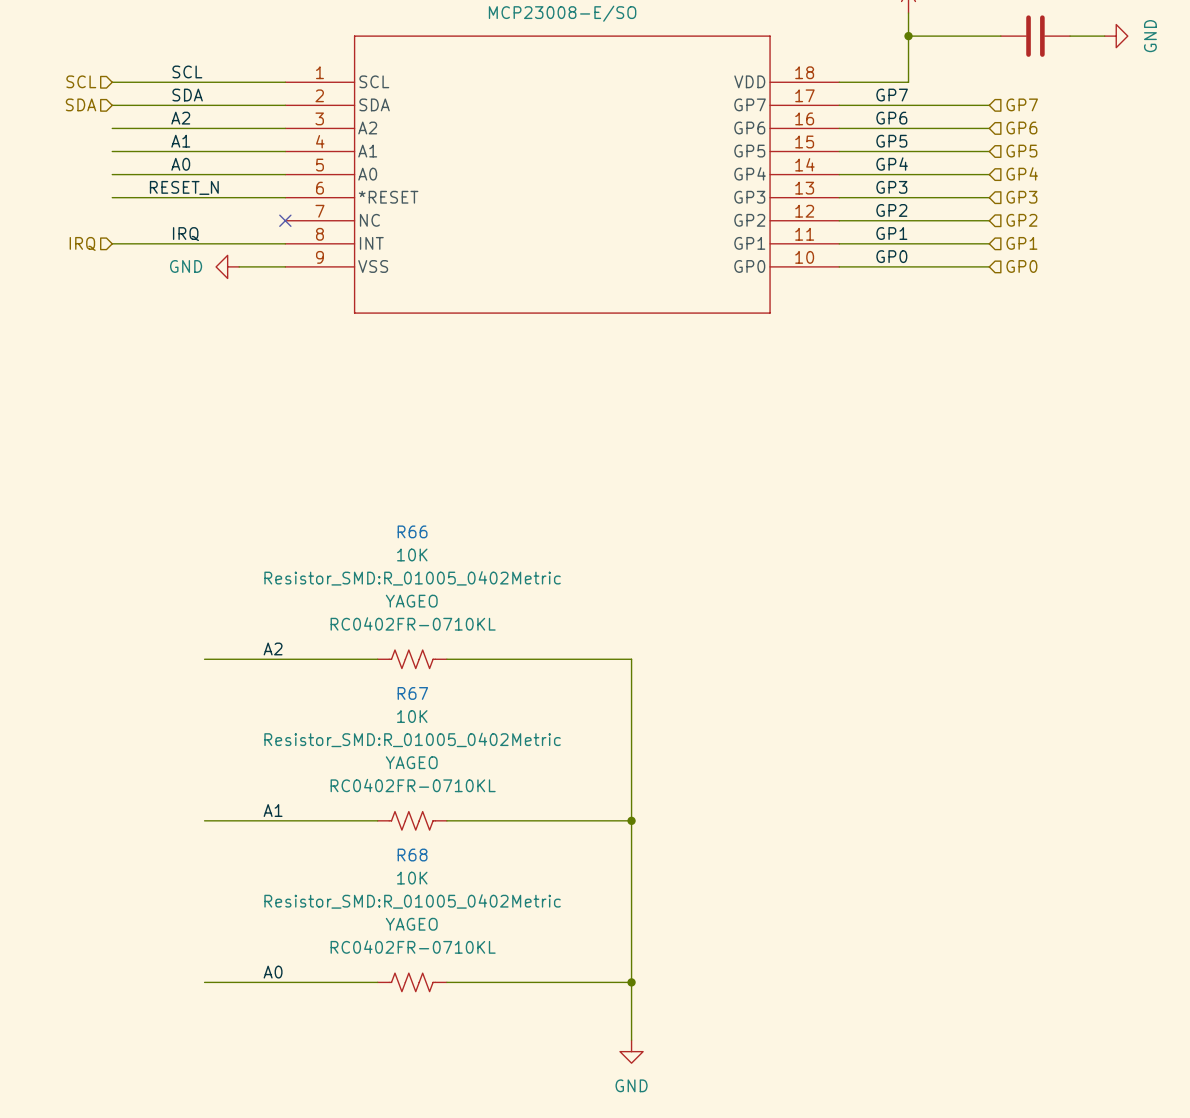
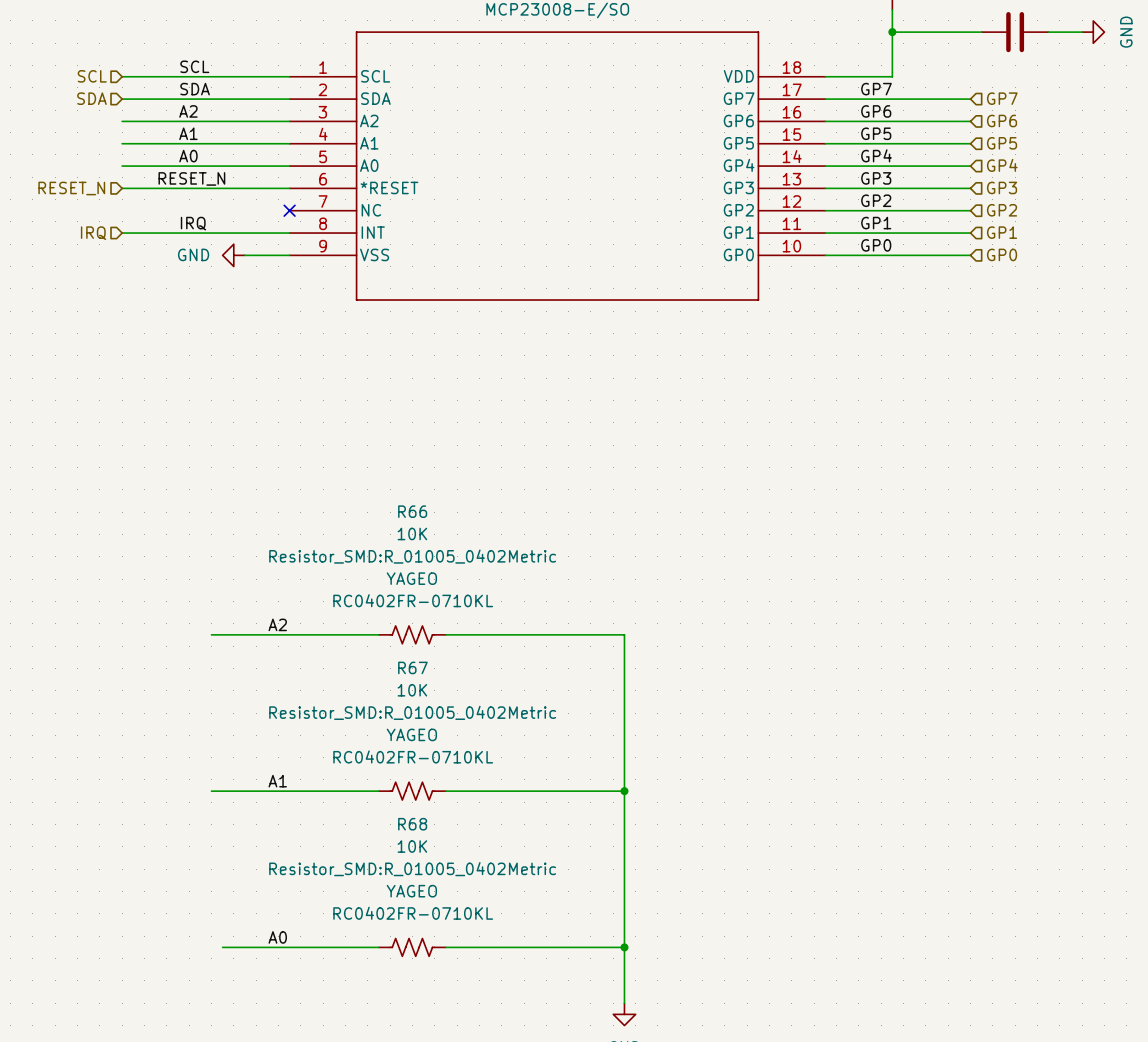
hierarchical label: none -> RESET_N (71, 188)
wire: (204, 982) (216, 982) -> none

